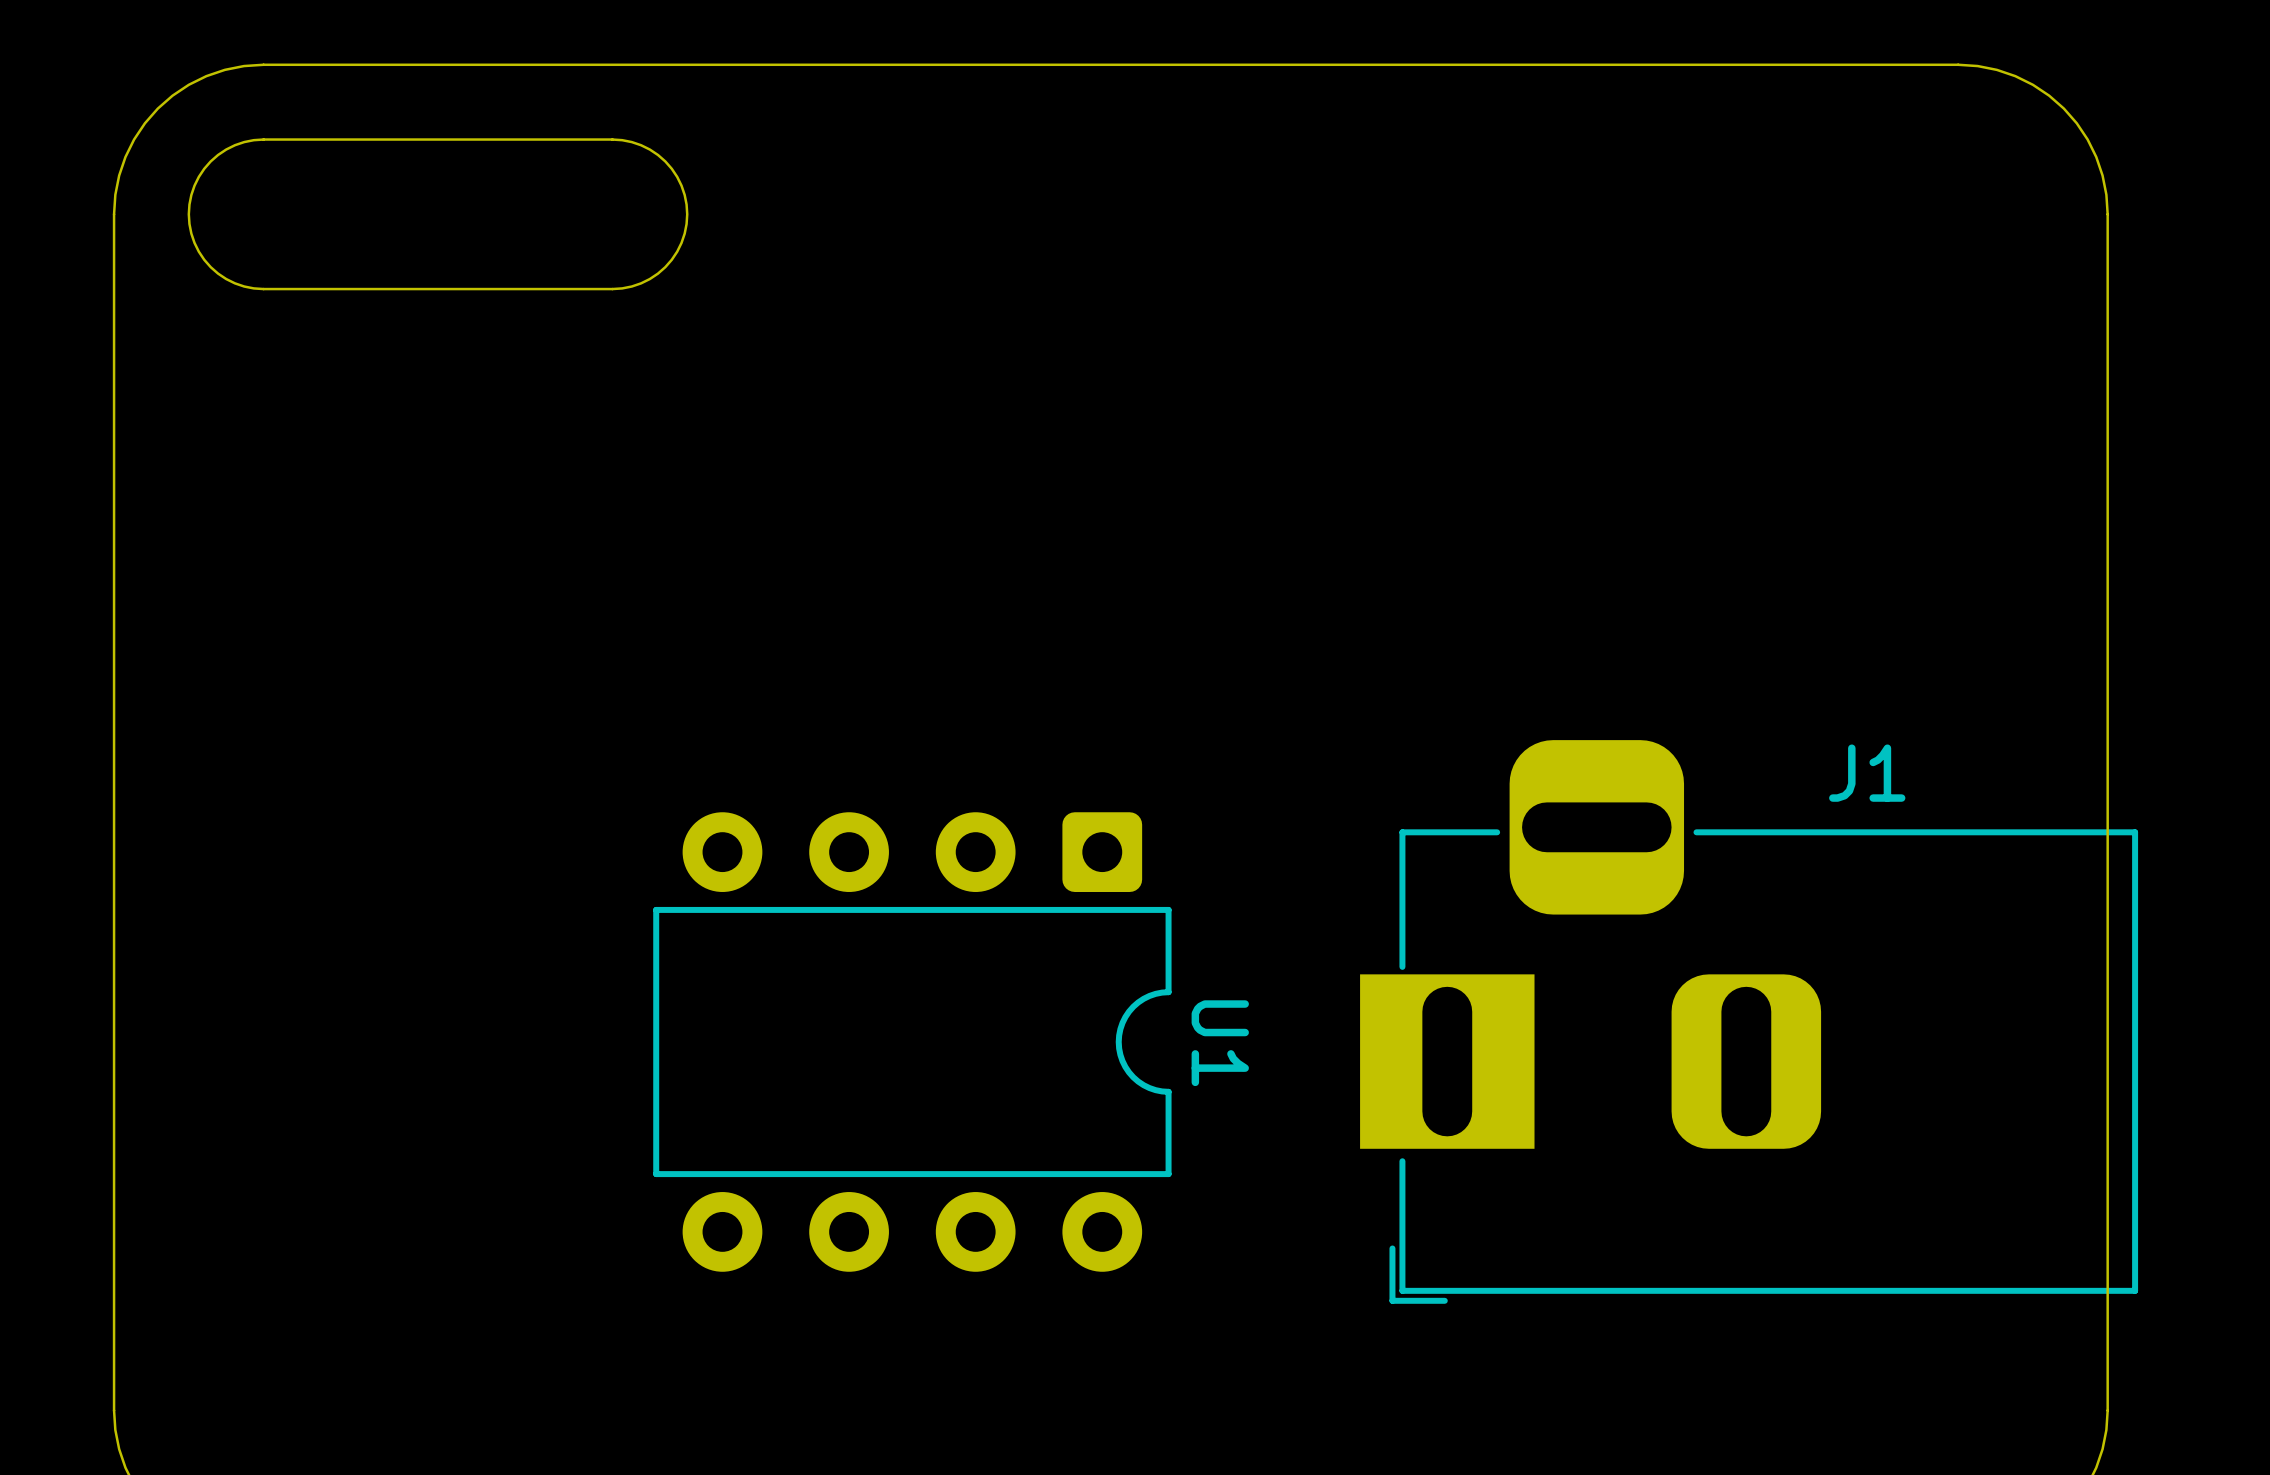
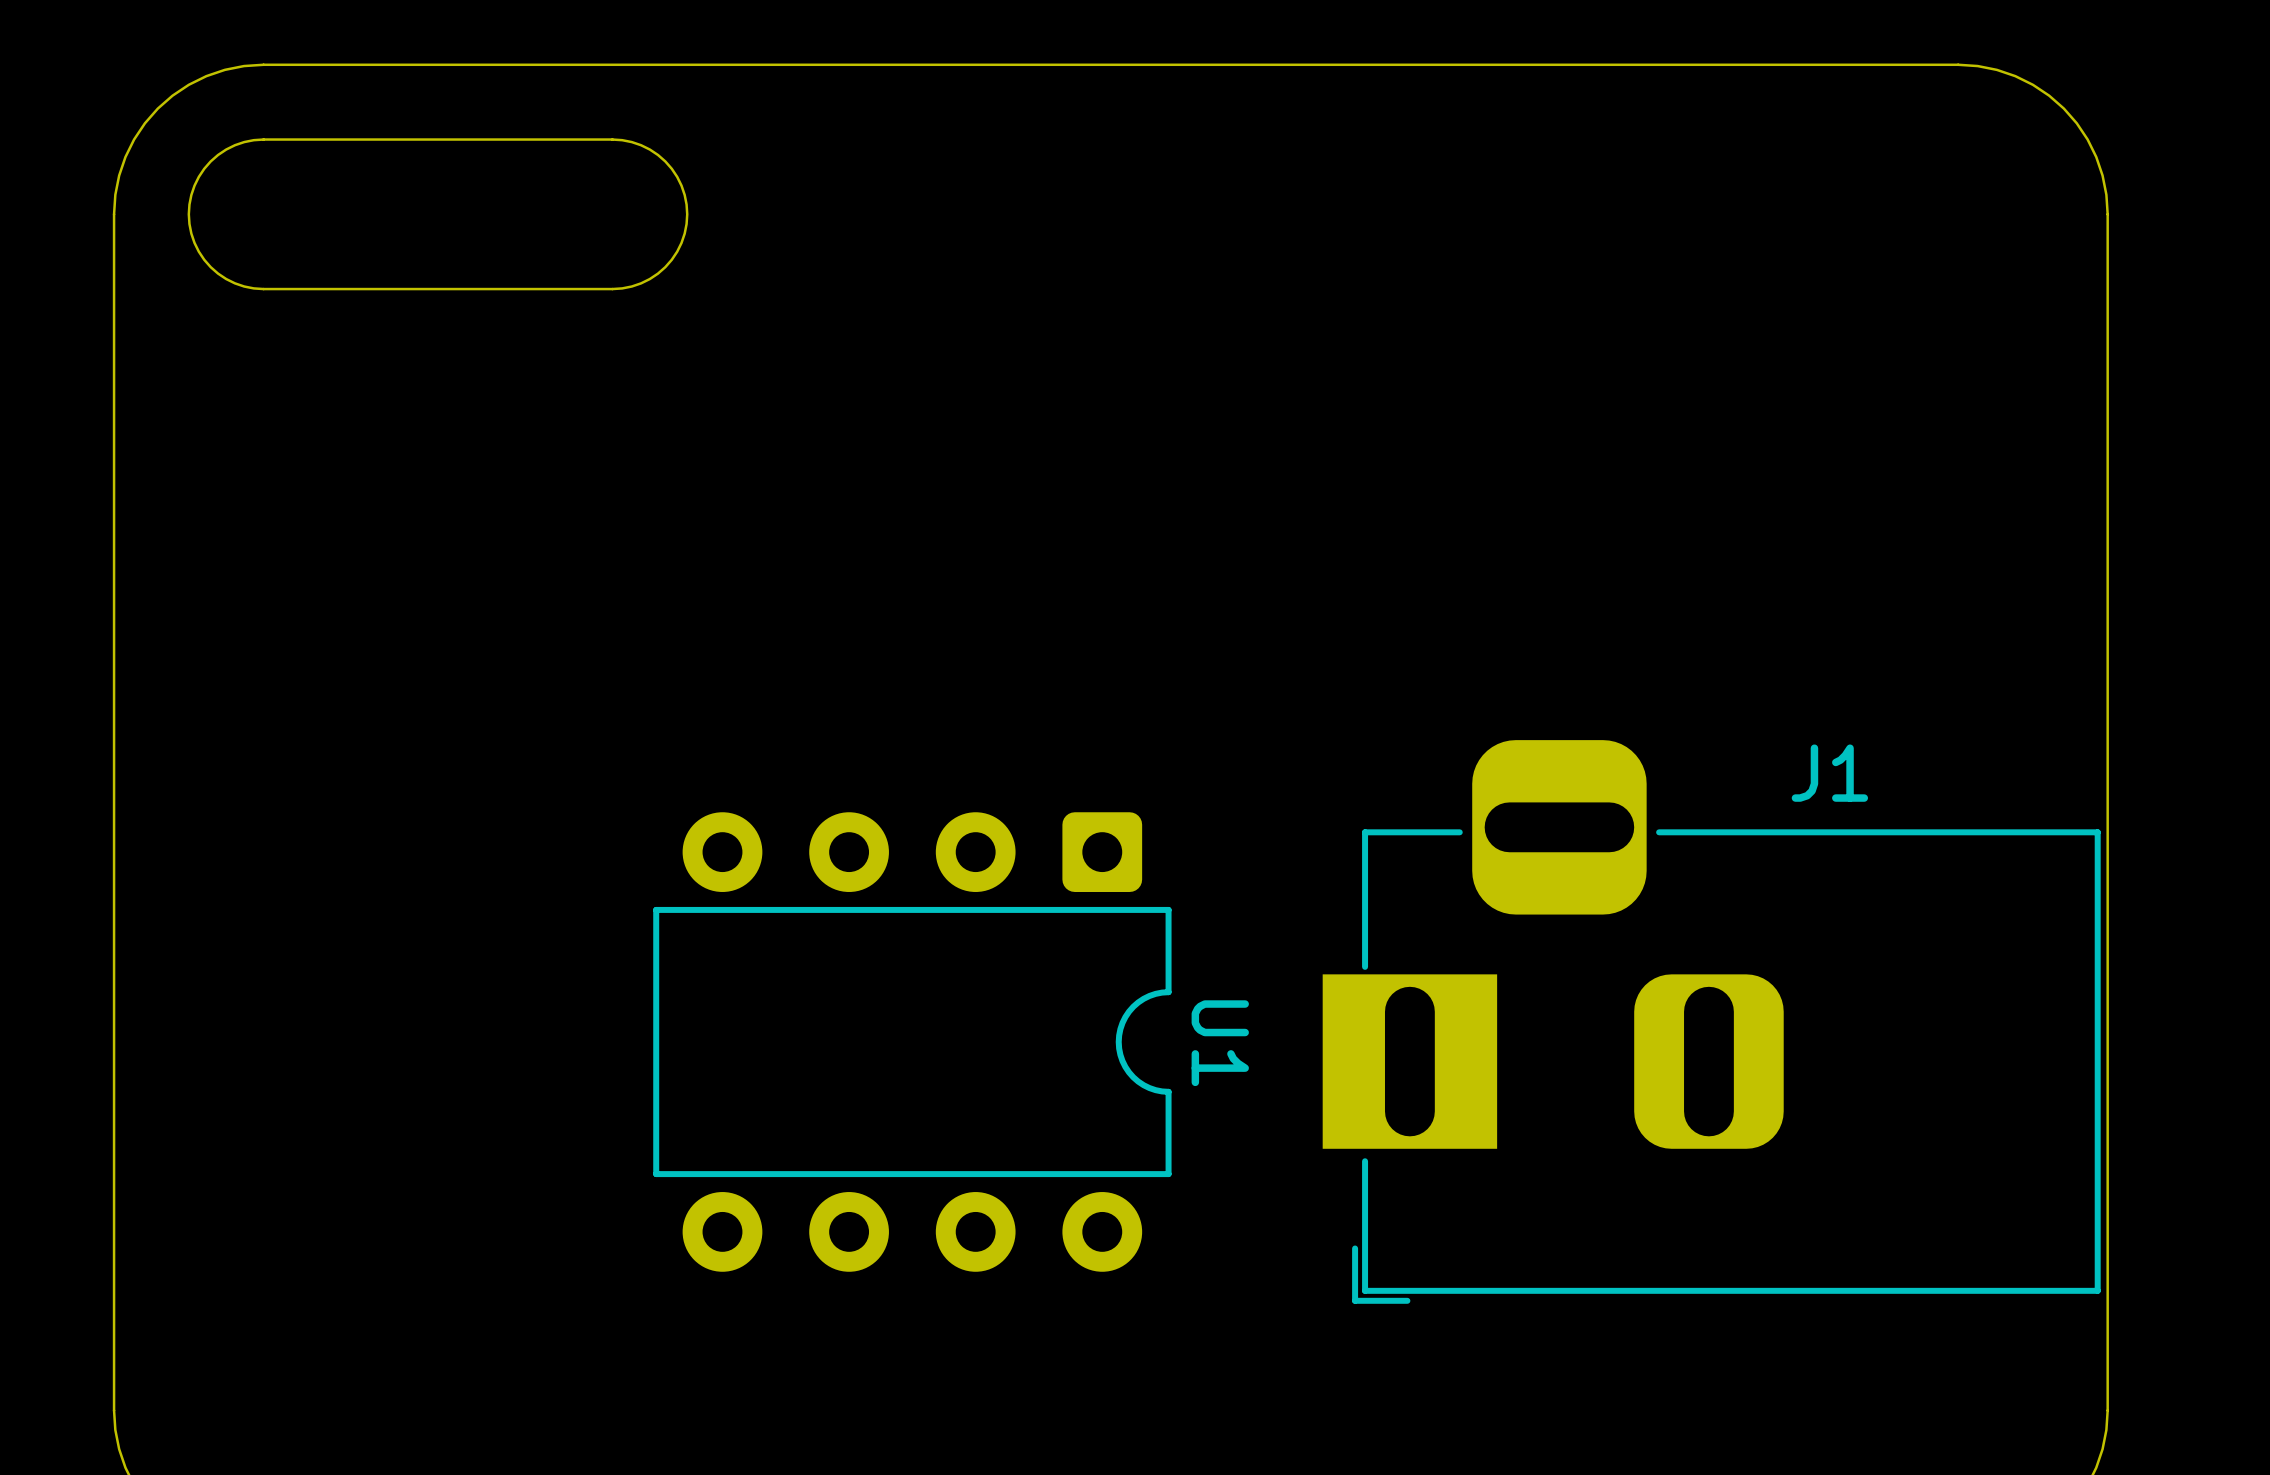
J1 position: (1749, 1021) -> (1711, 1021)

